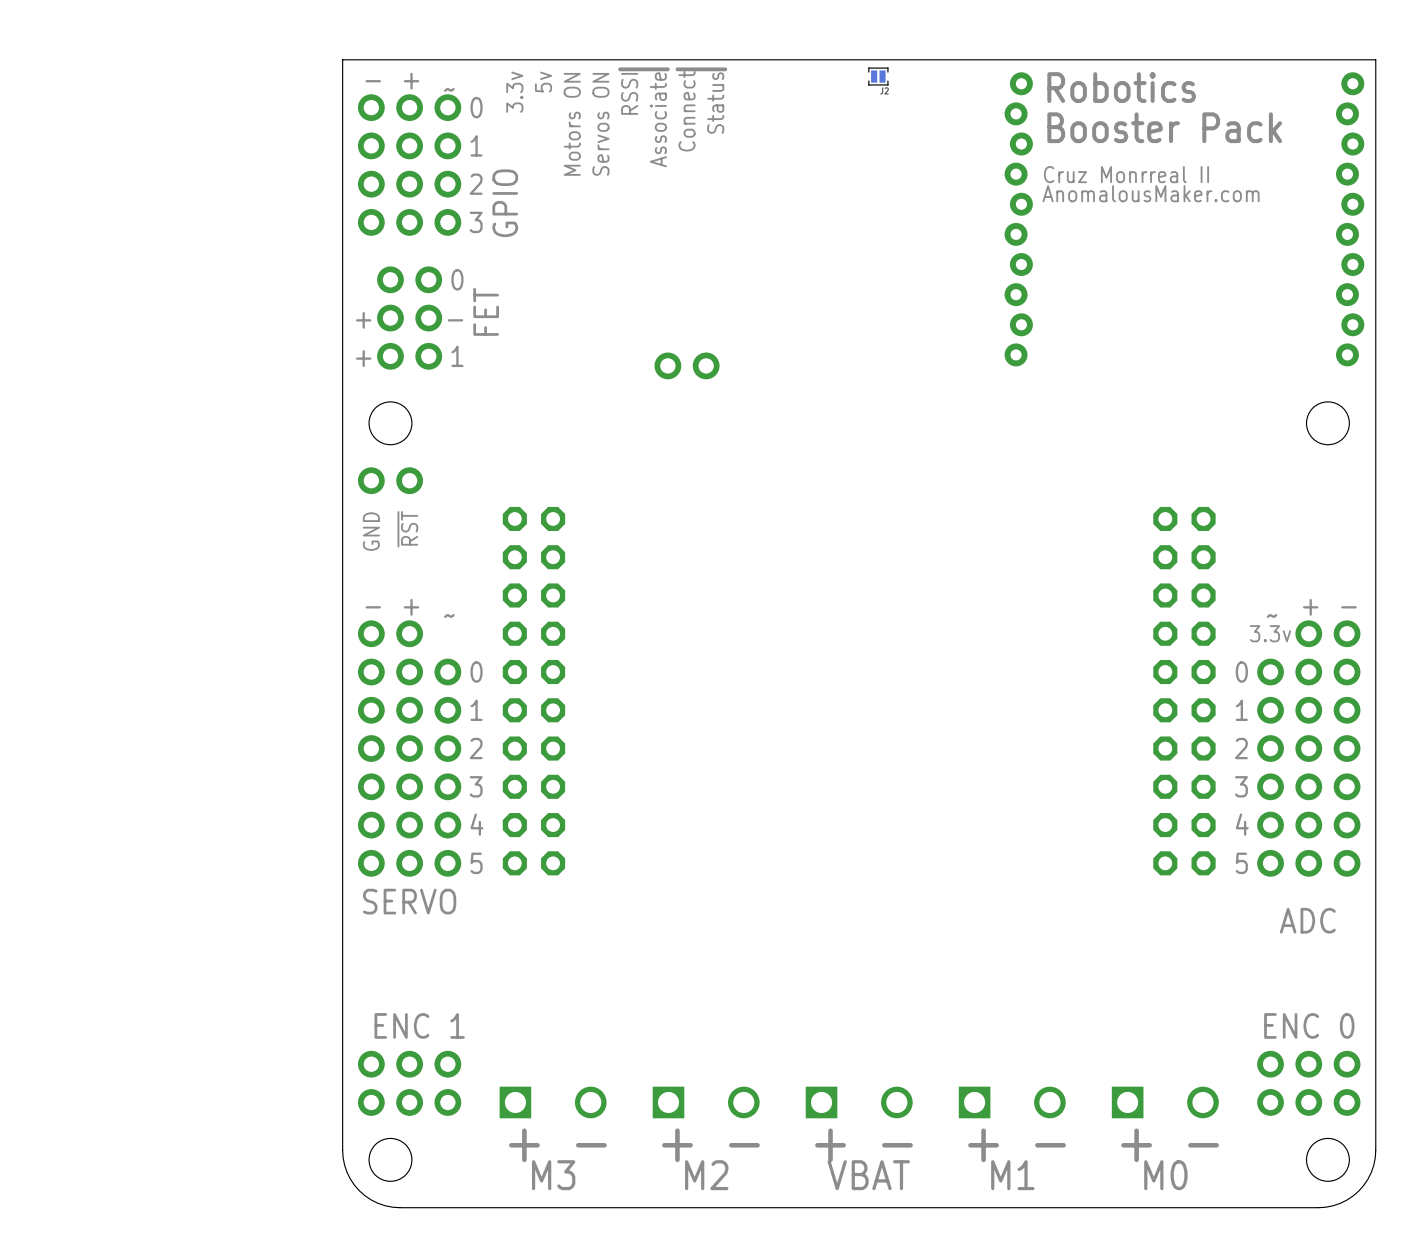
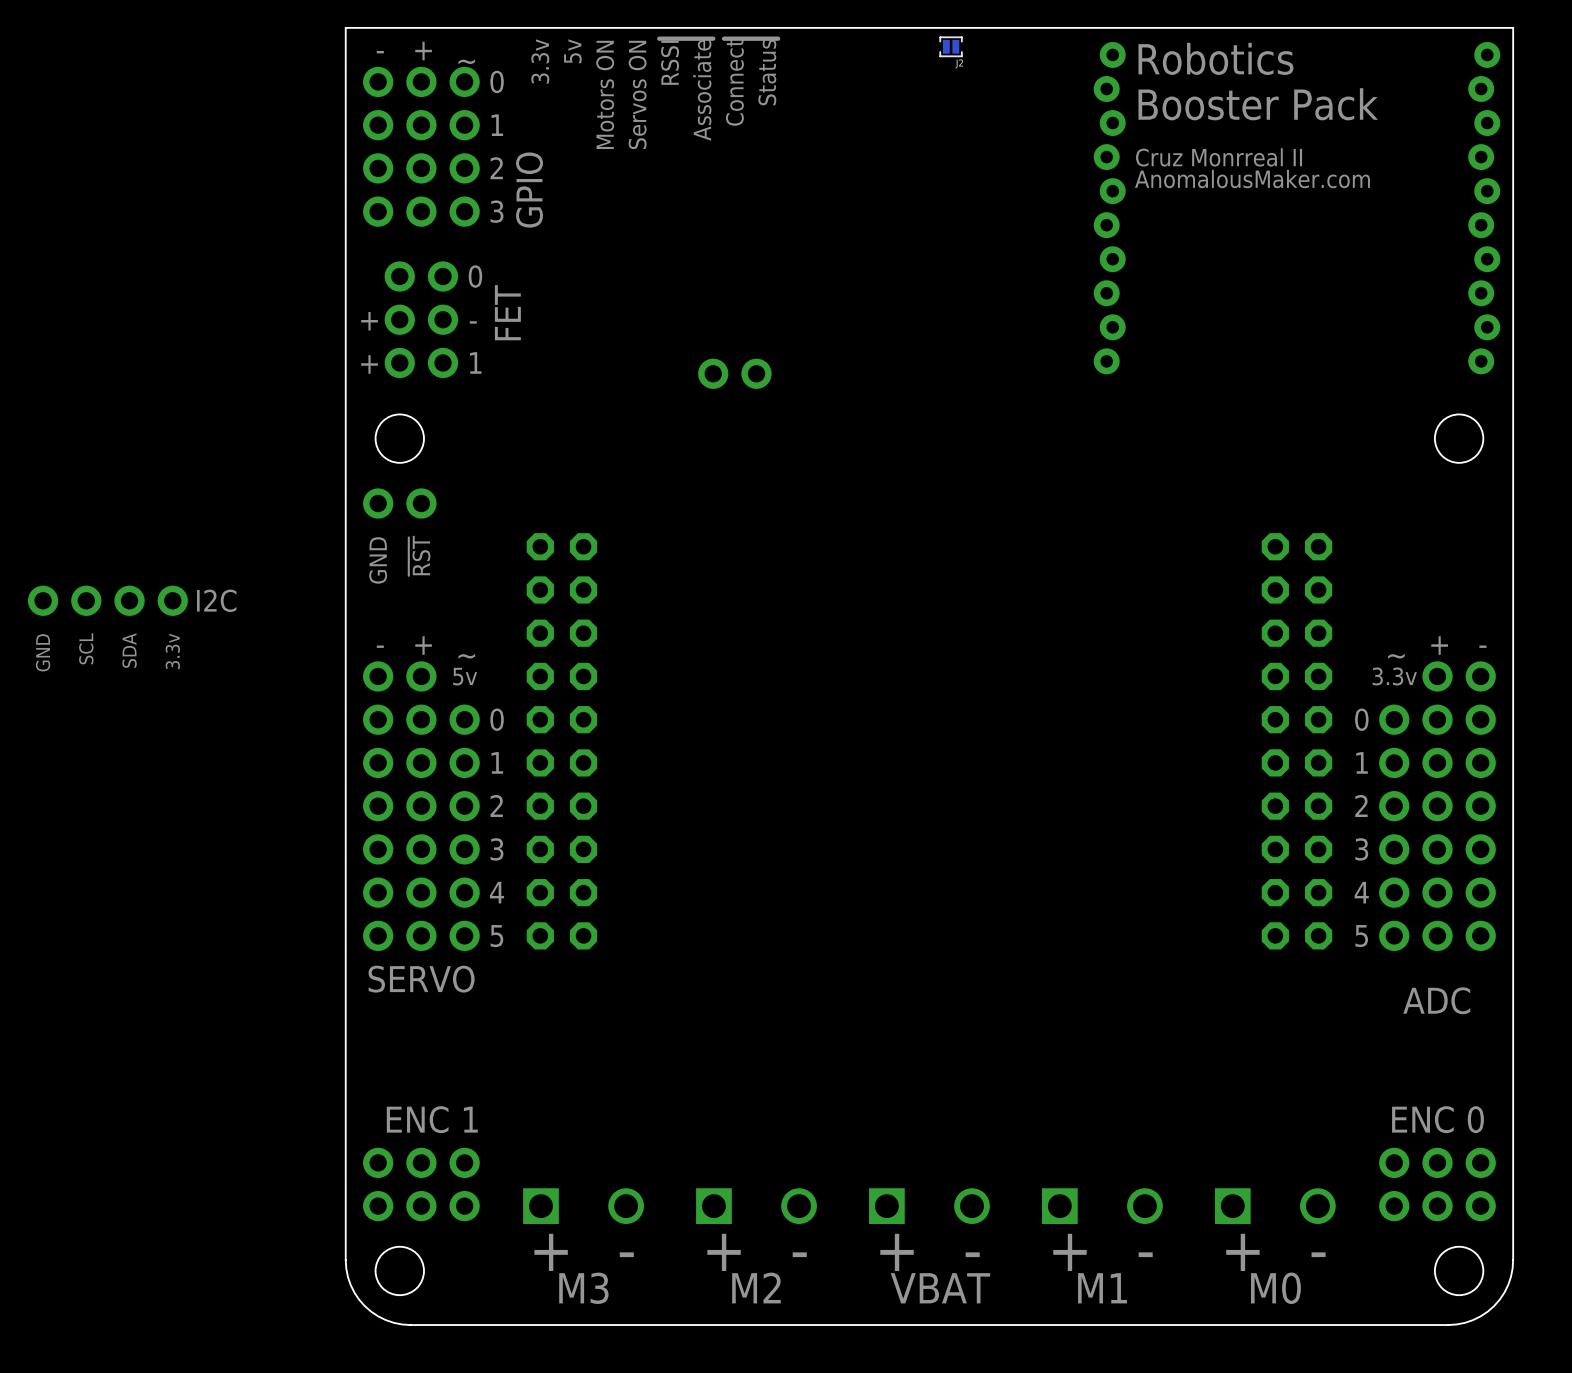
part: none -> (107, 600)
text: none -> I2C (216, 600)
text: none -> SCL (86, 648)
text: none -> SDA (129, 650)
text: none -> GND (43, 652)
text: none -> 3.3v (172, 651)
text: none -> 5v (465, 676)

